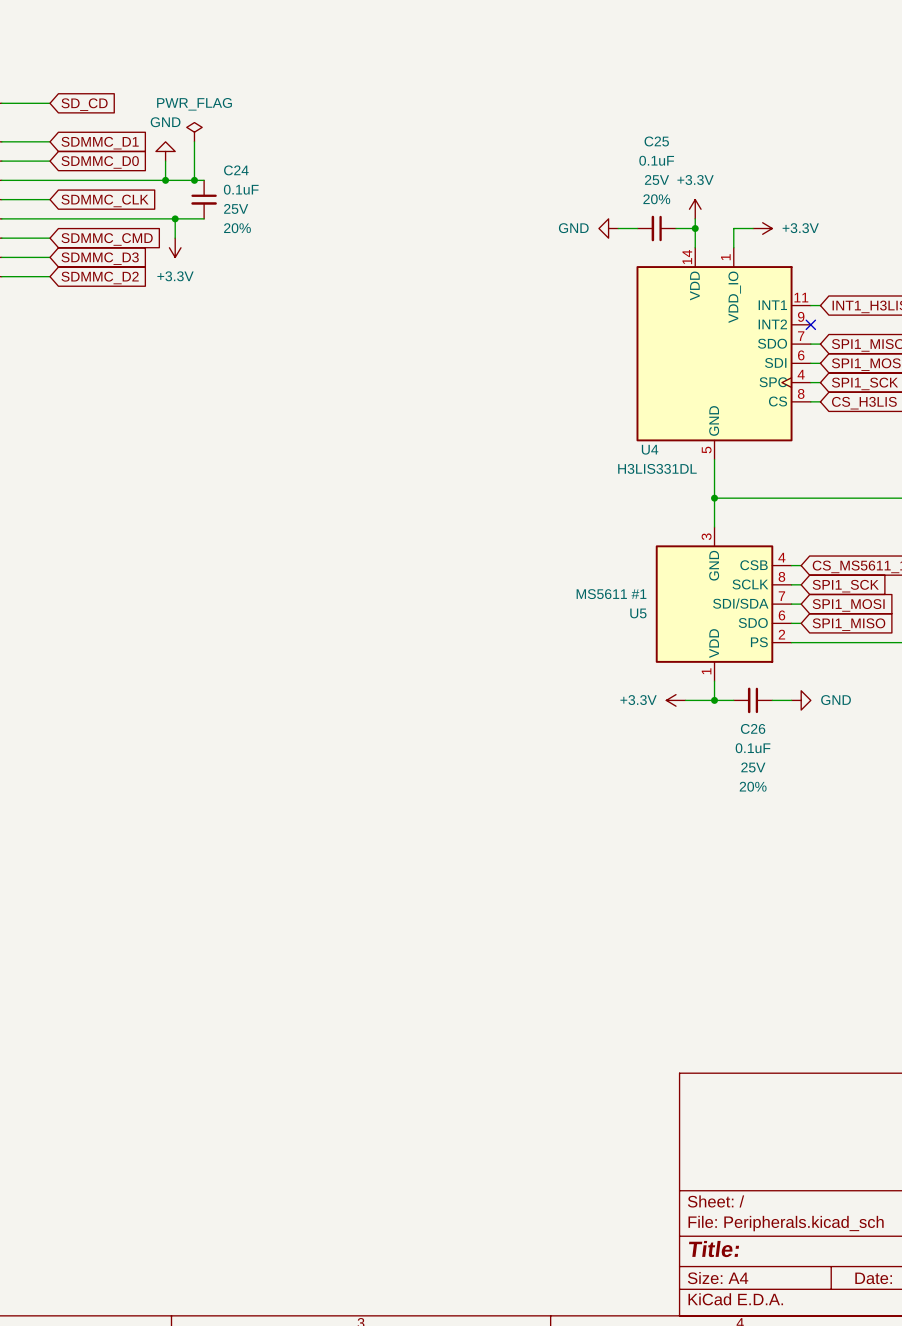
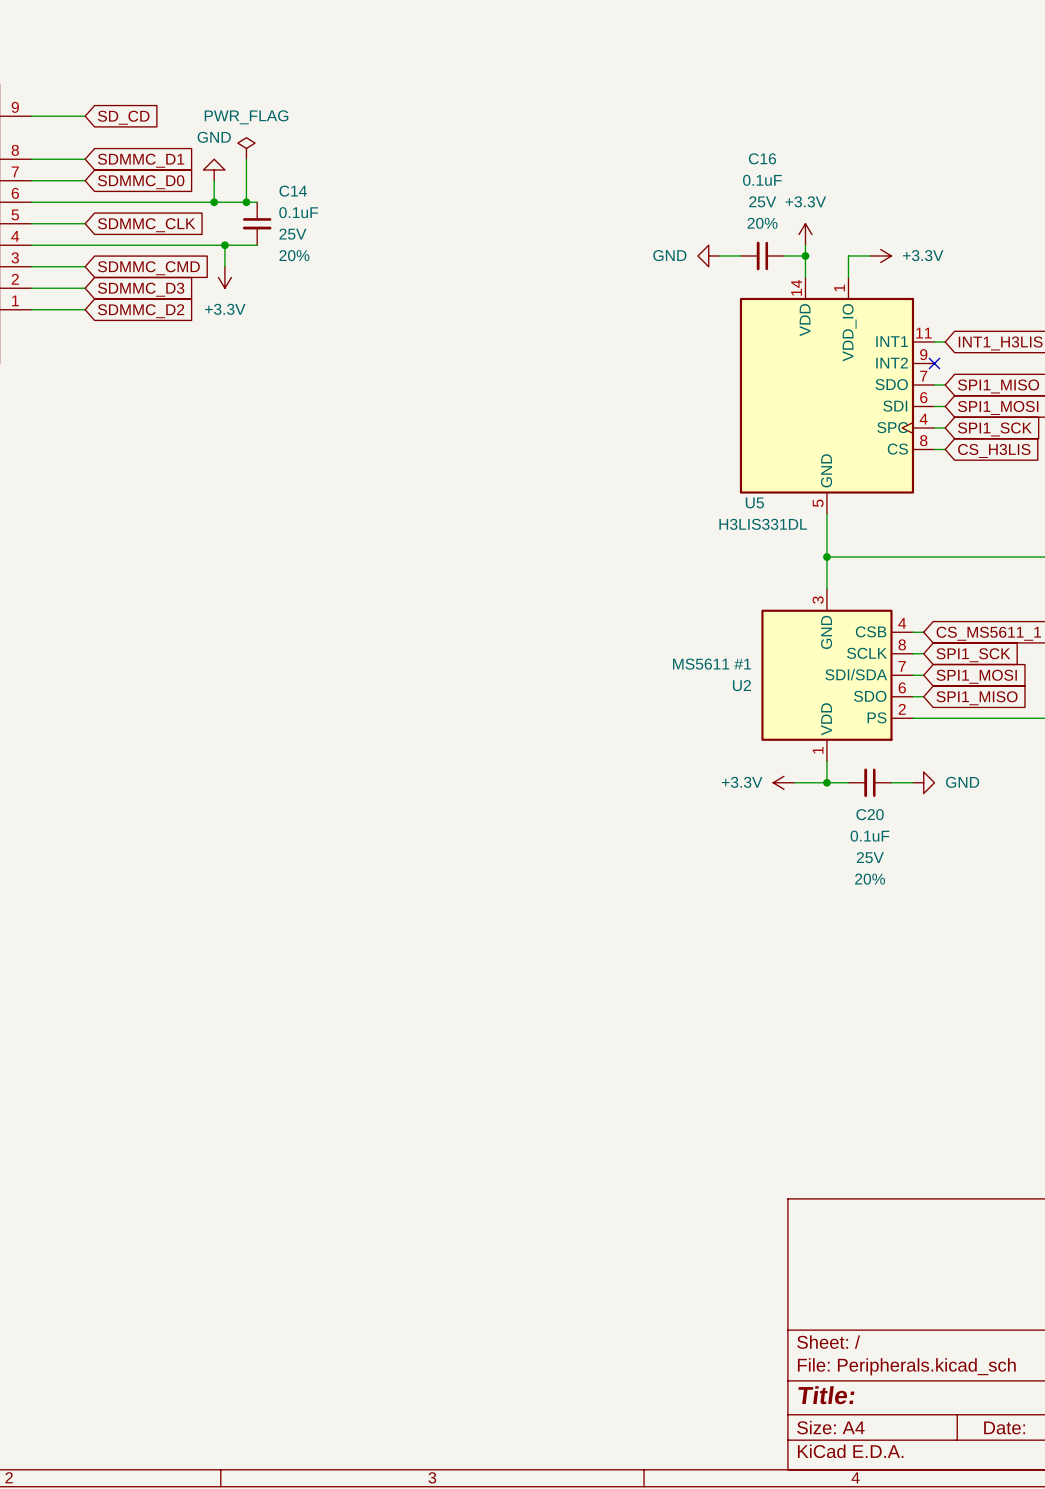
C25 name: C25 (656, 141) -> C16 (762, 158)
C24 name: C24 (236, 170) -> C14 (293, 191)
U4 name: U4 (650, 449) -> U5 (754, 502)
U5 name: U5 (638, 613) -> U2 (741, 685)
C26 name: C26 (753, 728) -> C20 (870, 814)

